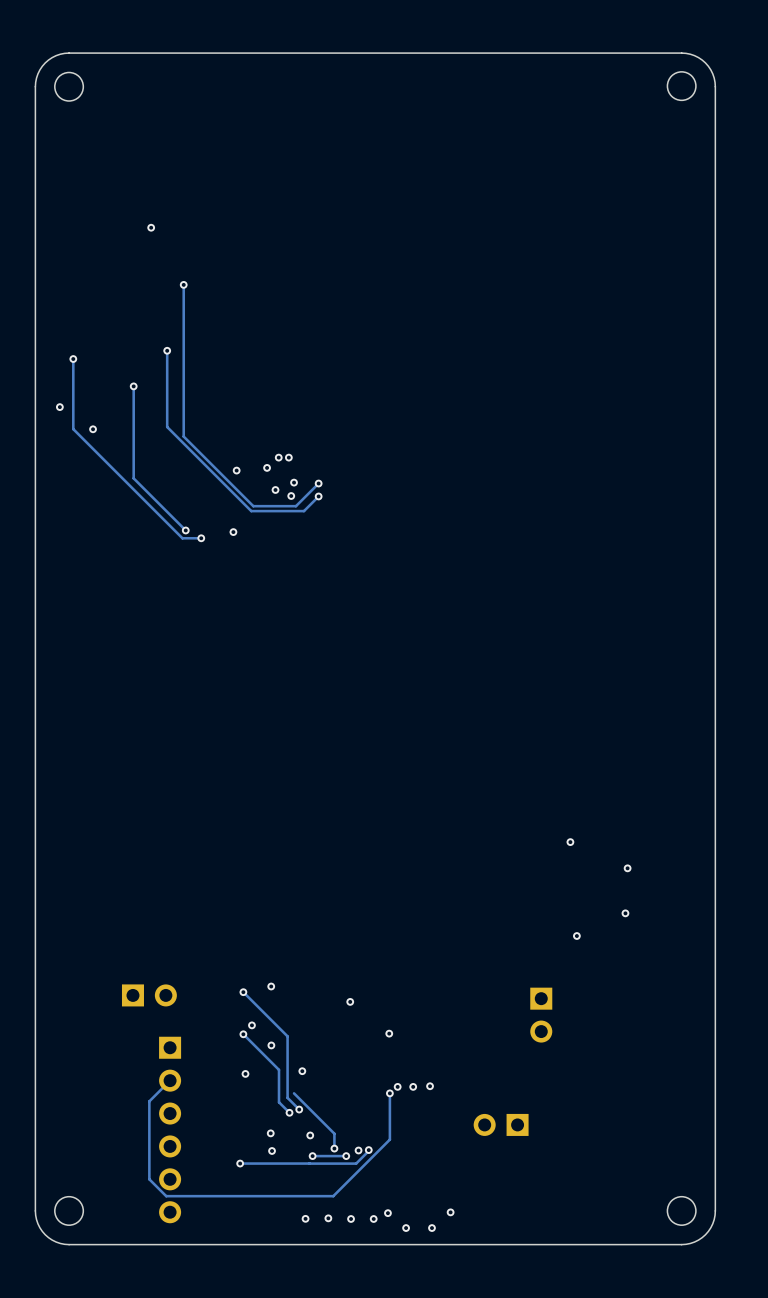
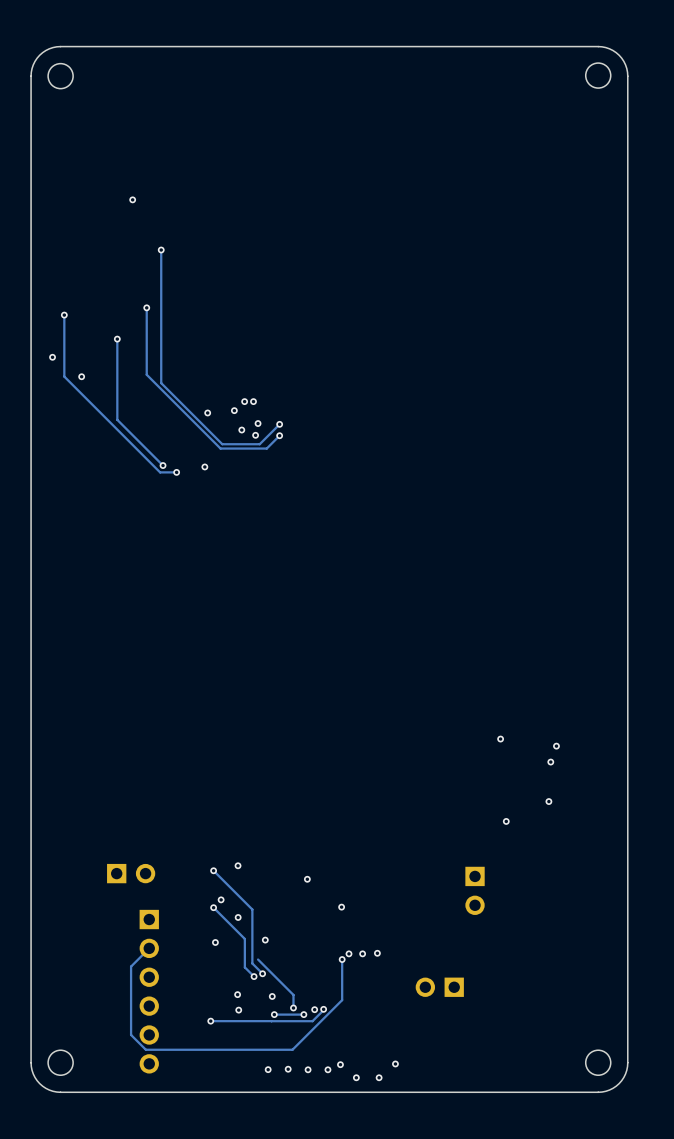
via: none -> (556, 746)

